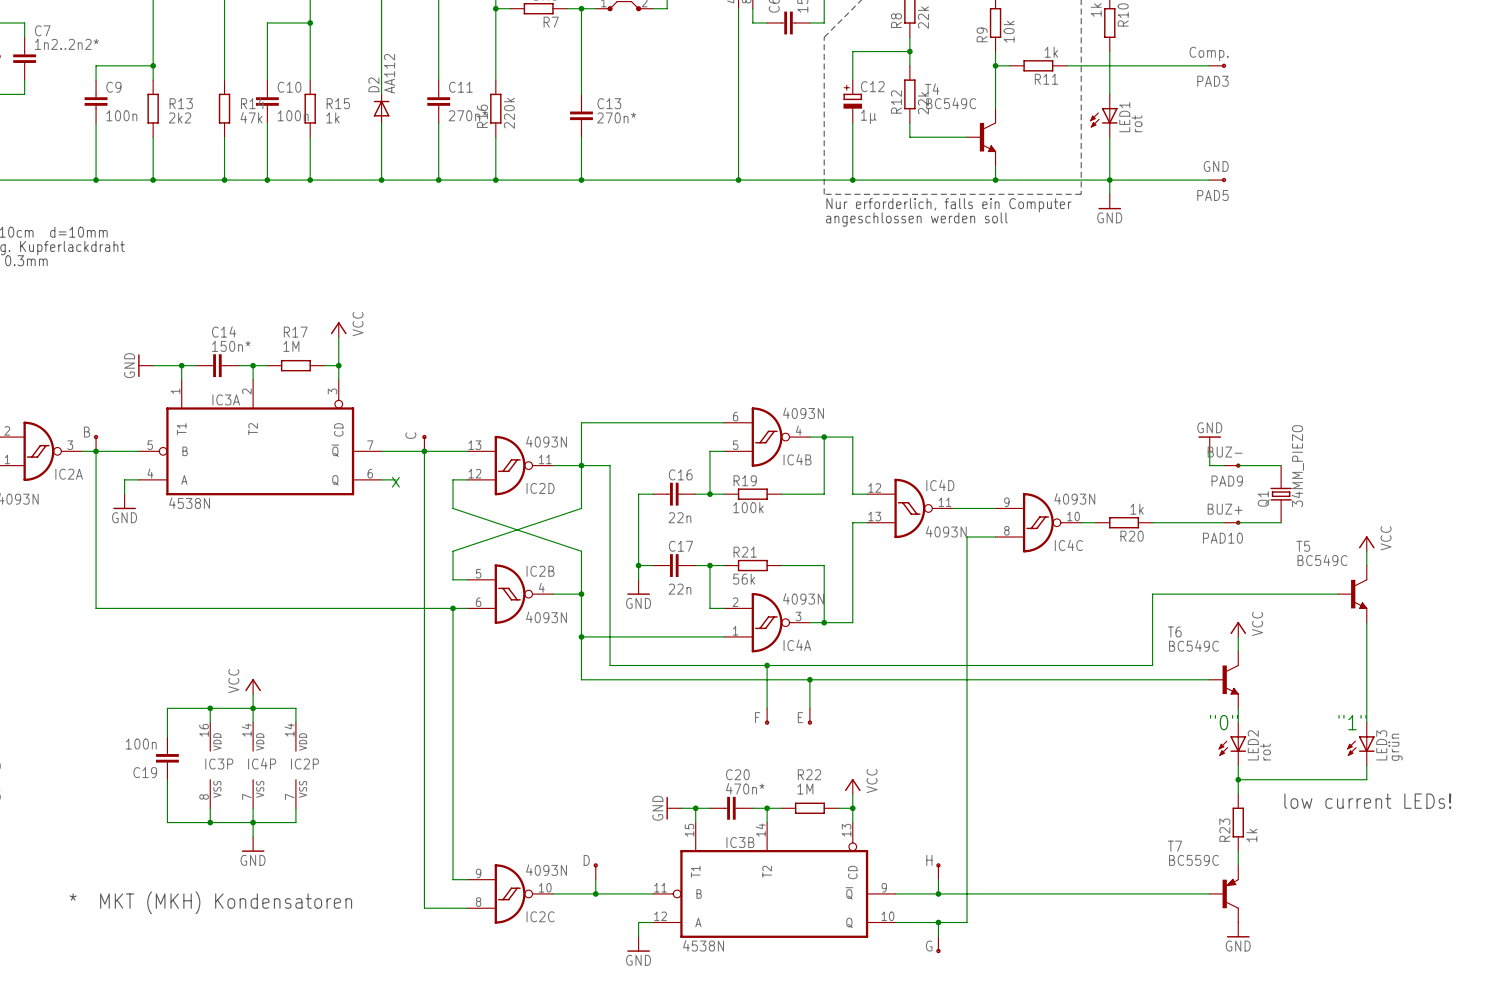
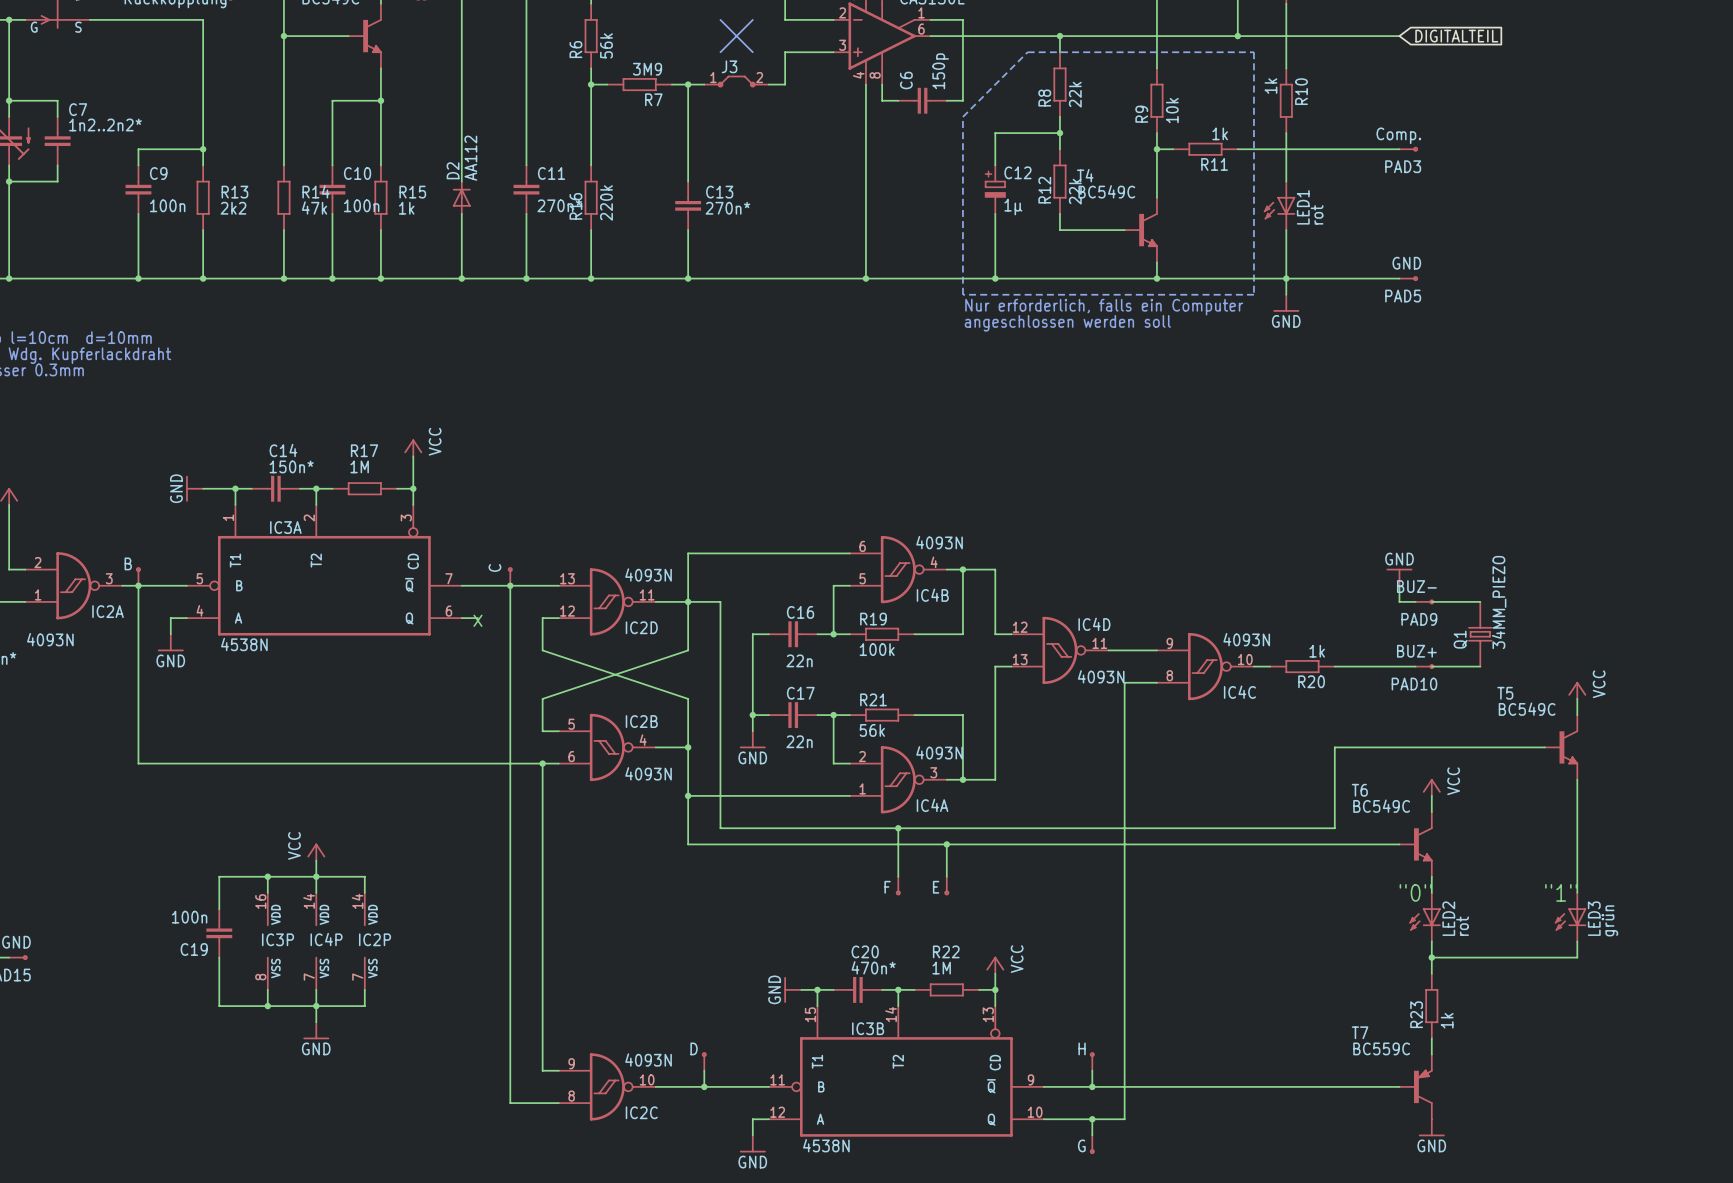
text: low current LEDs! (1367, 801) -> none
text: * MKT (MKH) Kondensatoren (210, 902) -> none

